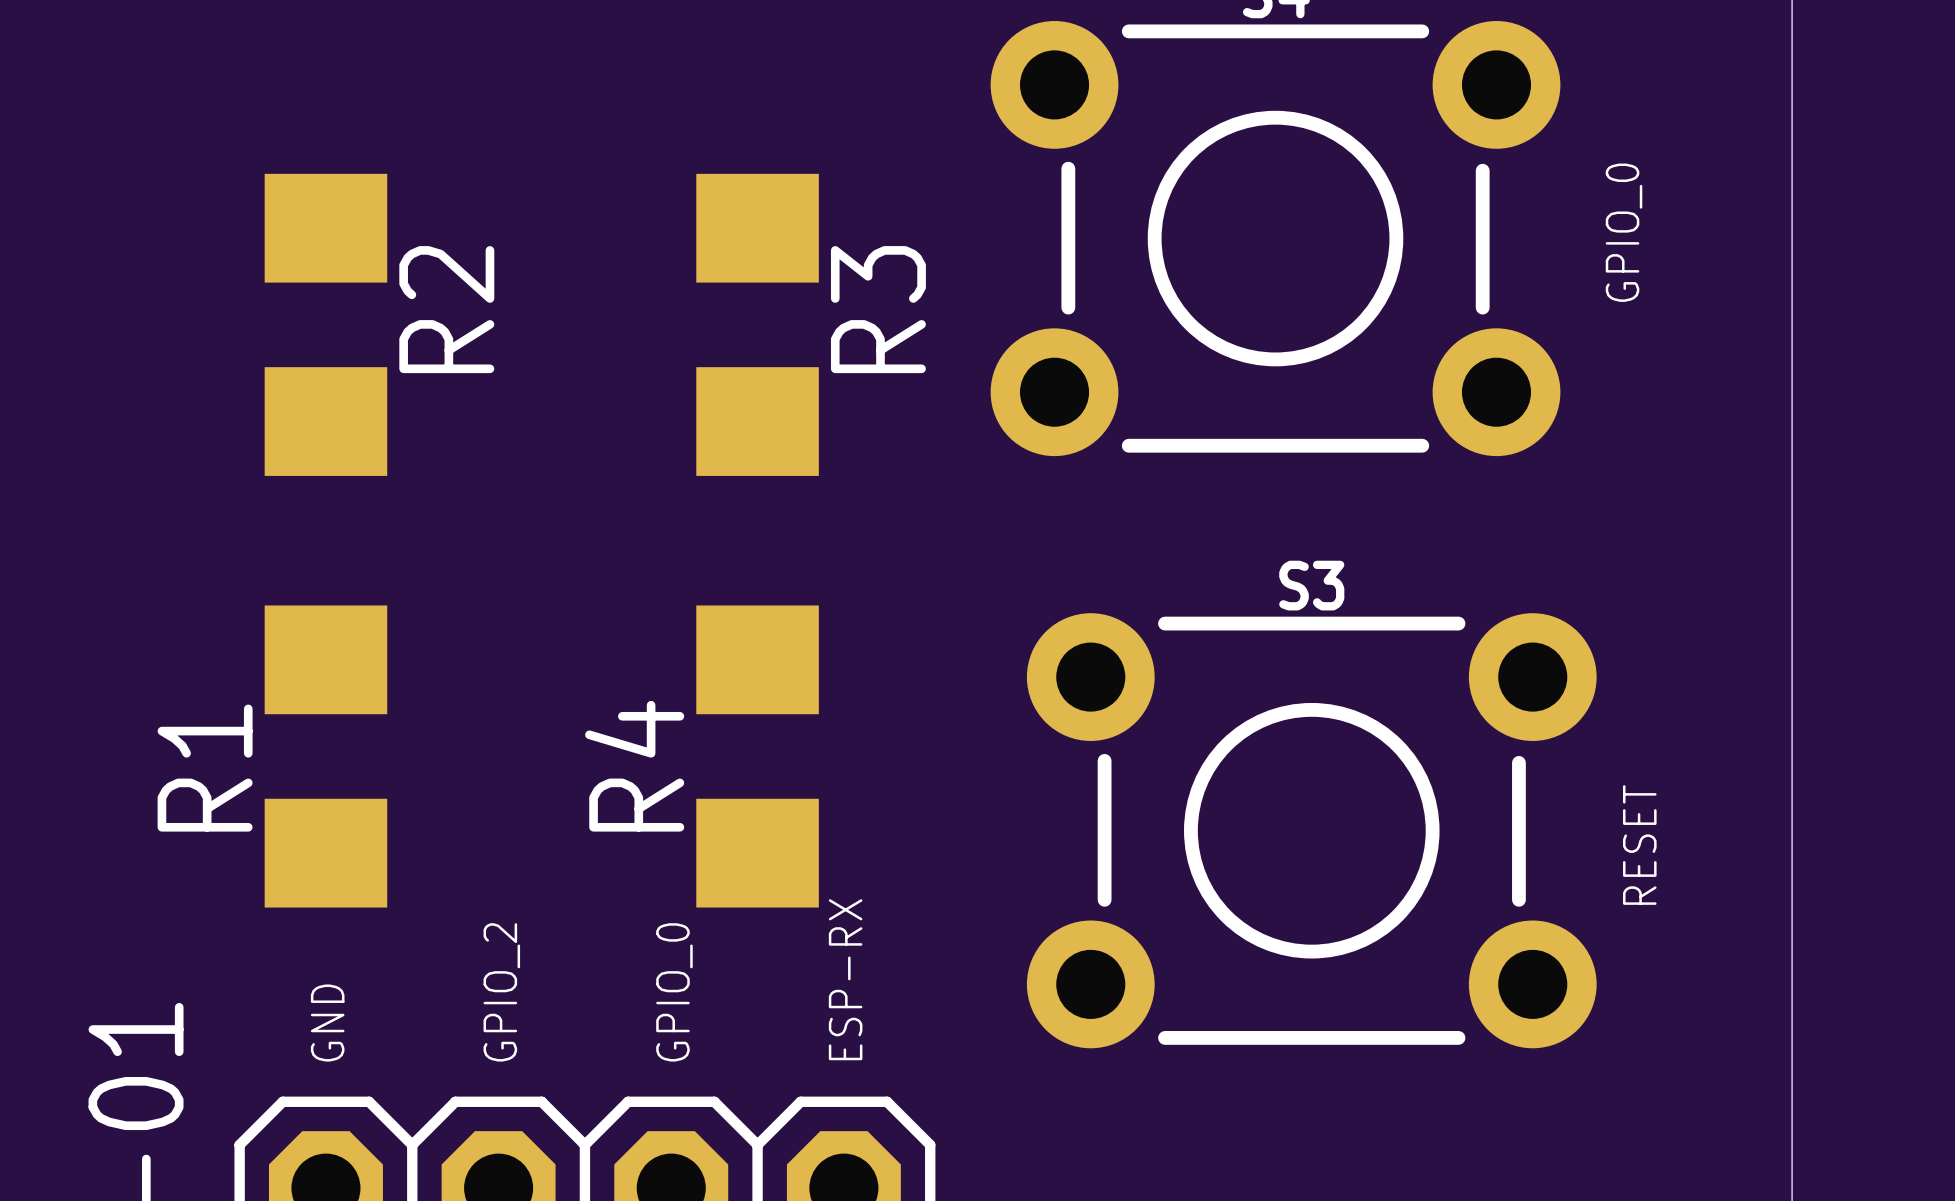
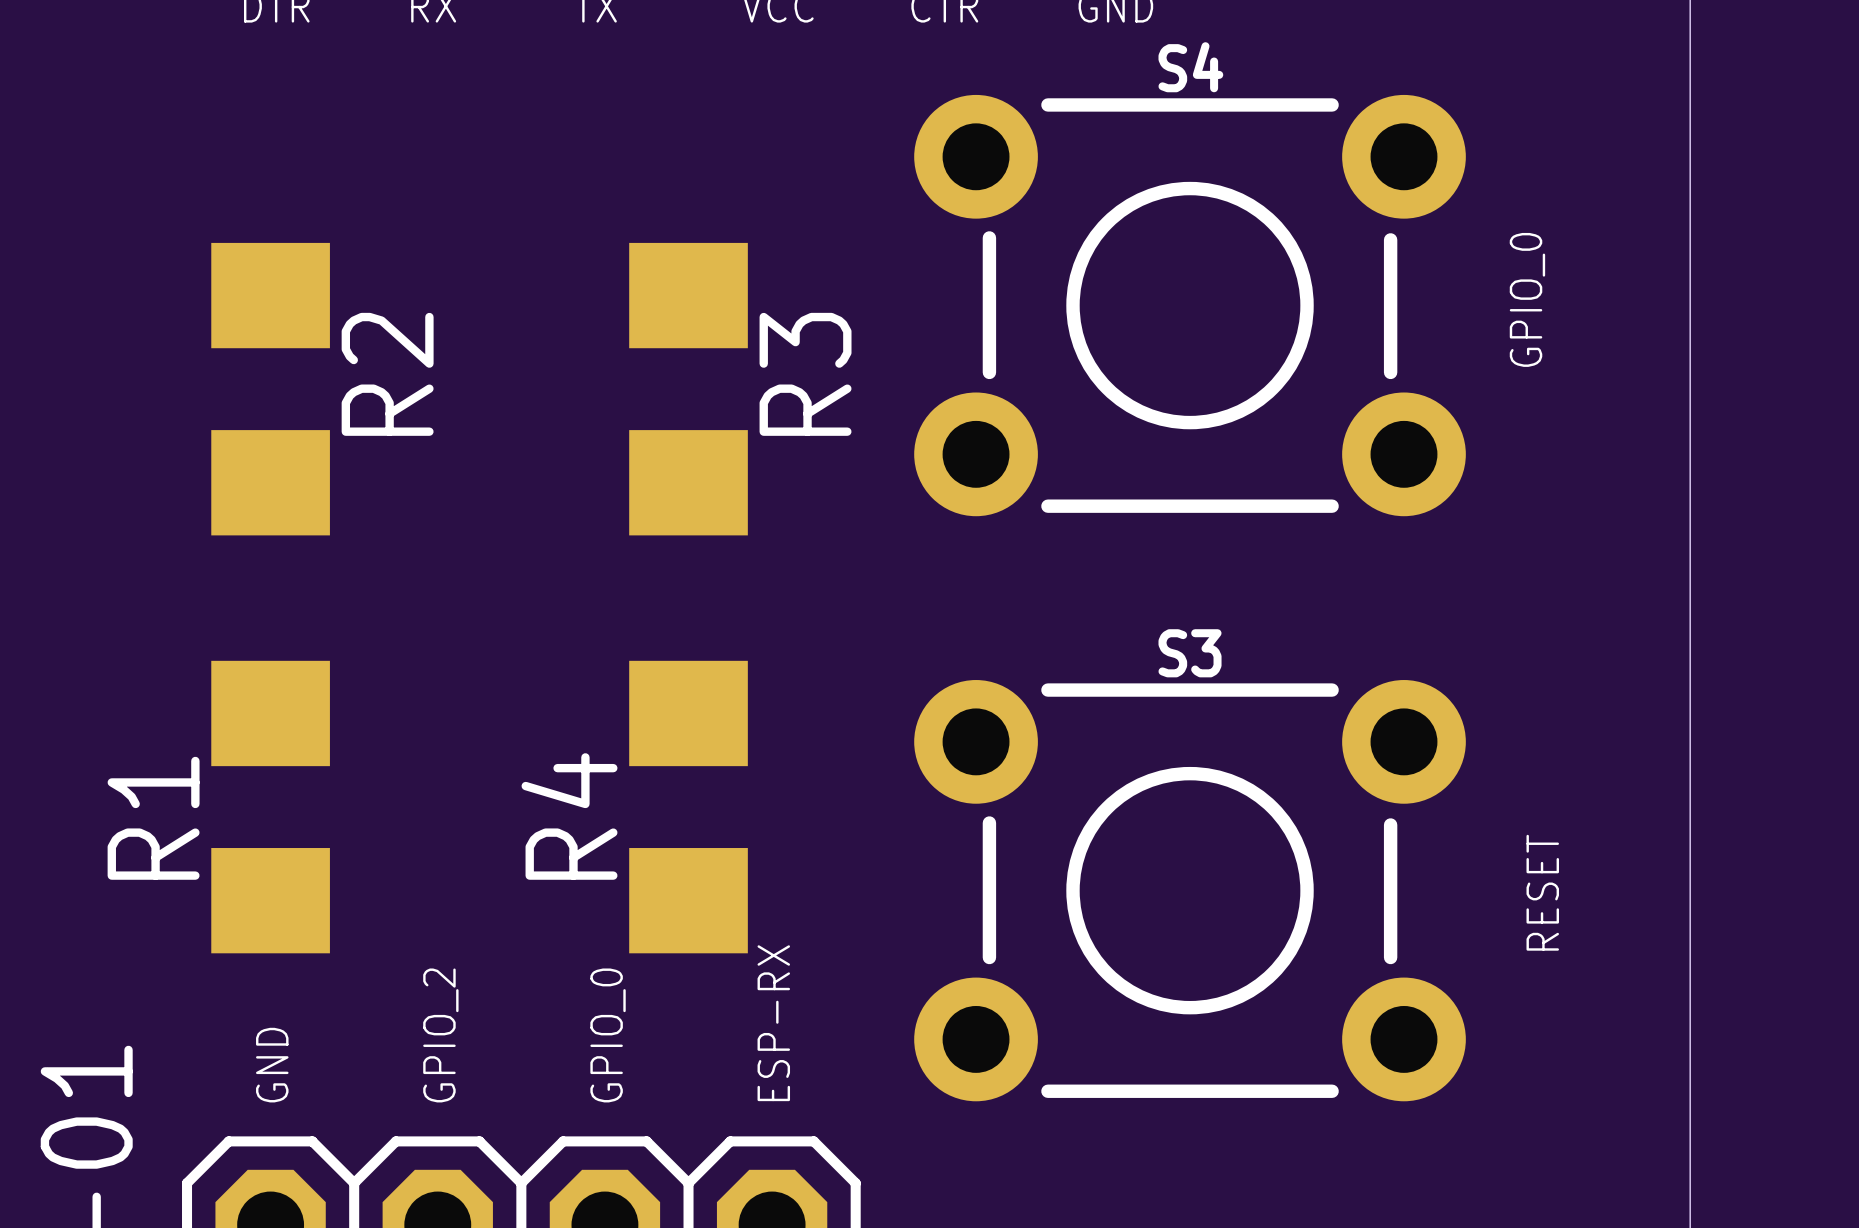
S3 position: (1311, 830) -> (1190, 890)

